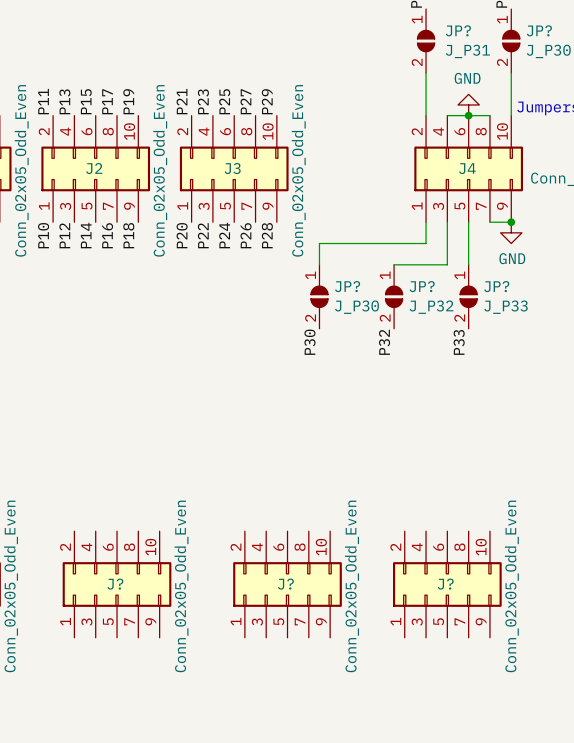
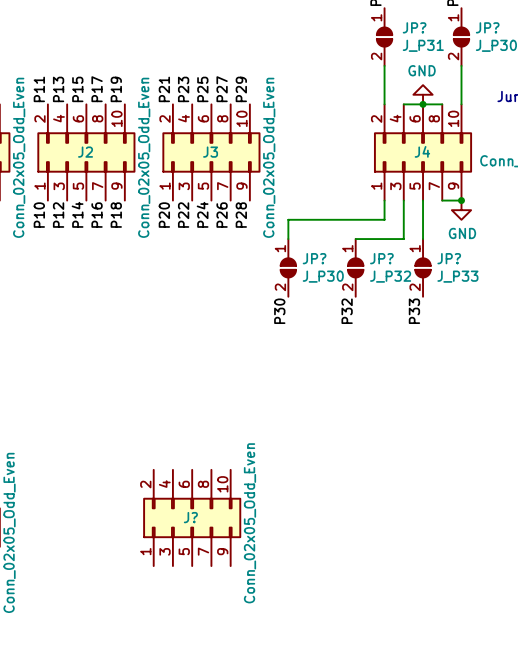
J?: none -> Conn_02x05_Odd_Even (192, 517)
J?: Conn_02x05_Odd_Even (117, 584) -> none
J?: Conn_02x05_Odd_Even (287, 584) -> none
J?: Conn_02x05_Odd_Even (447, 584) -> none

